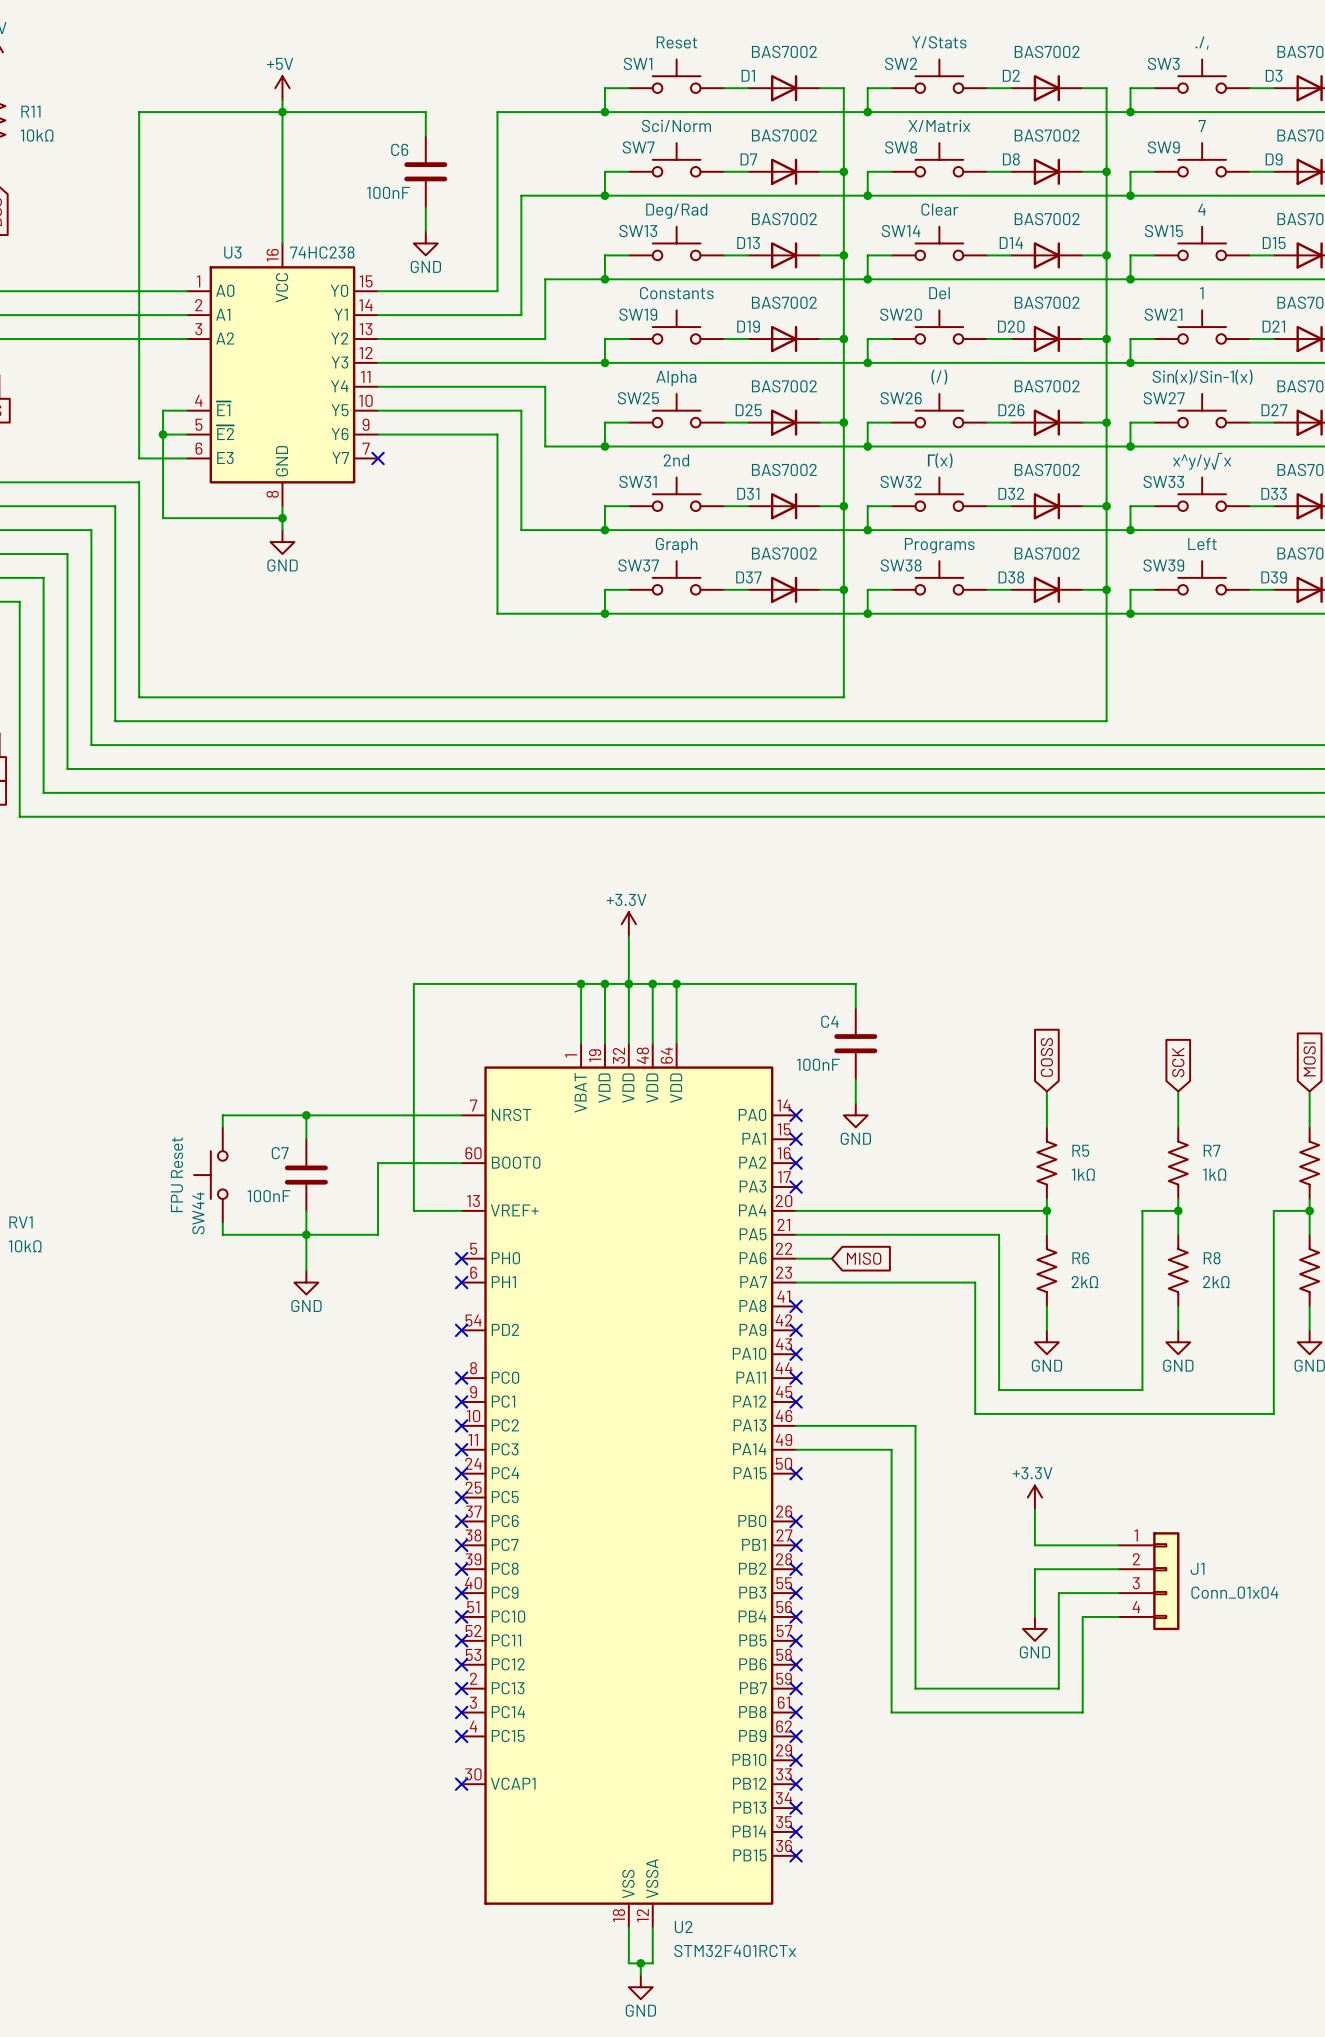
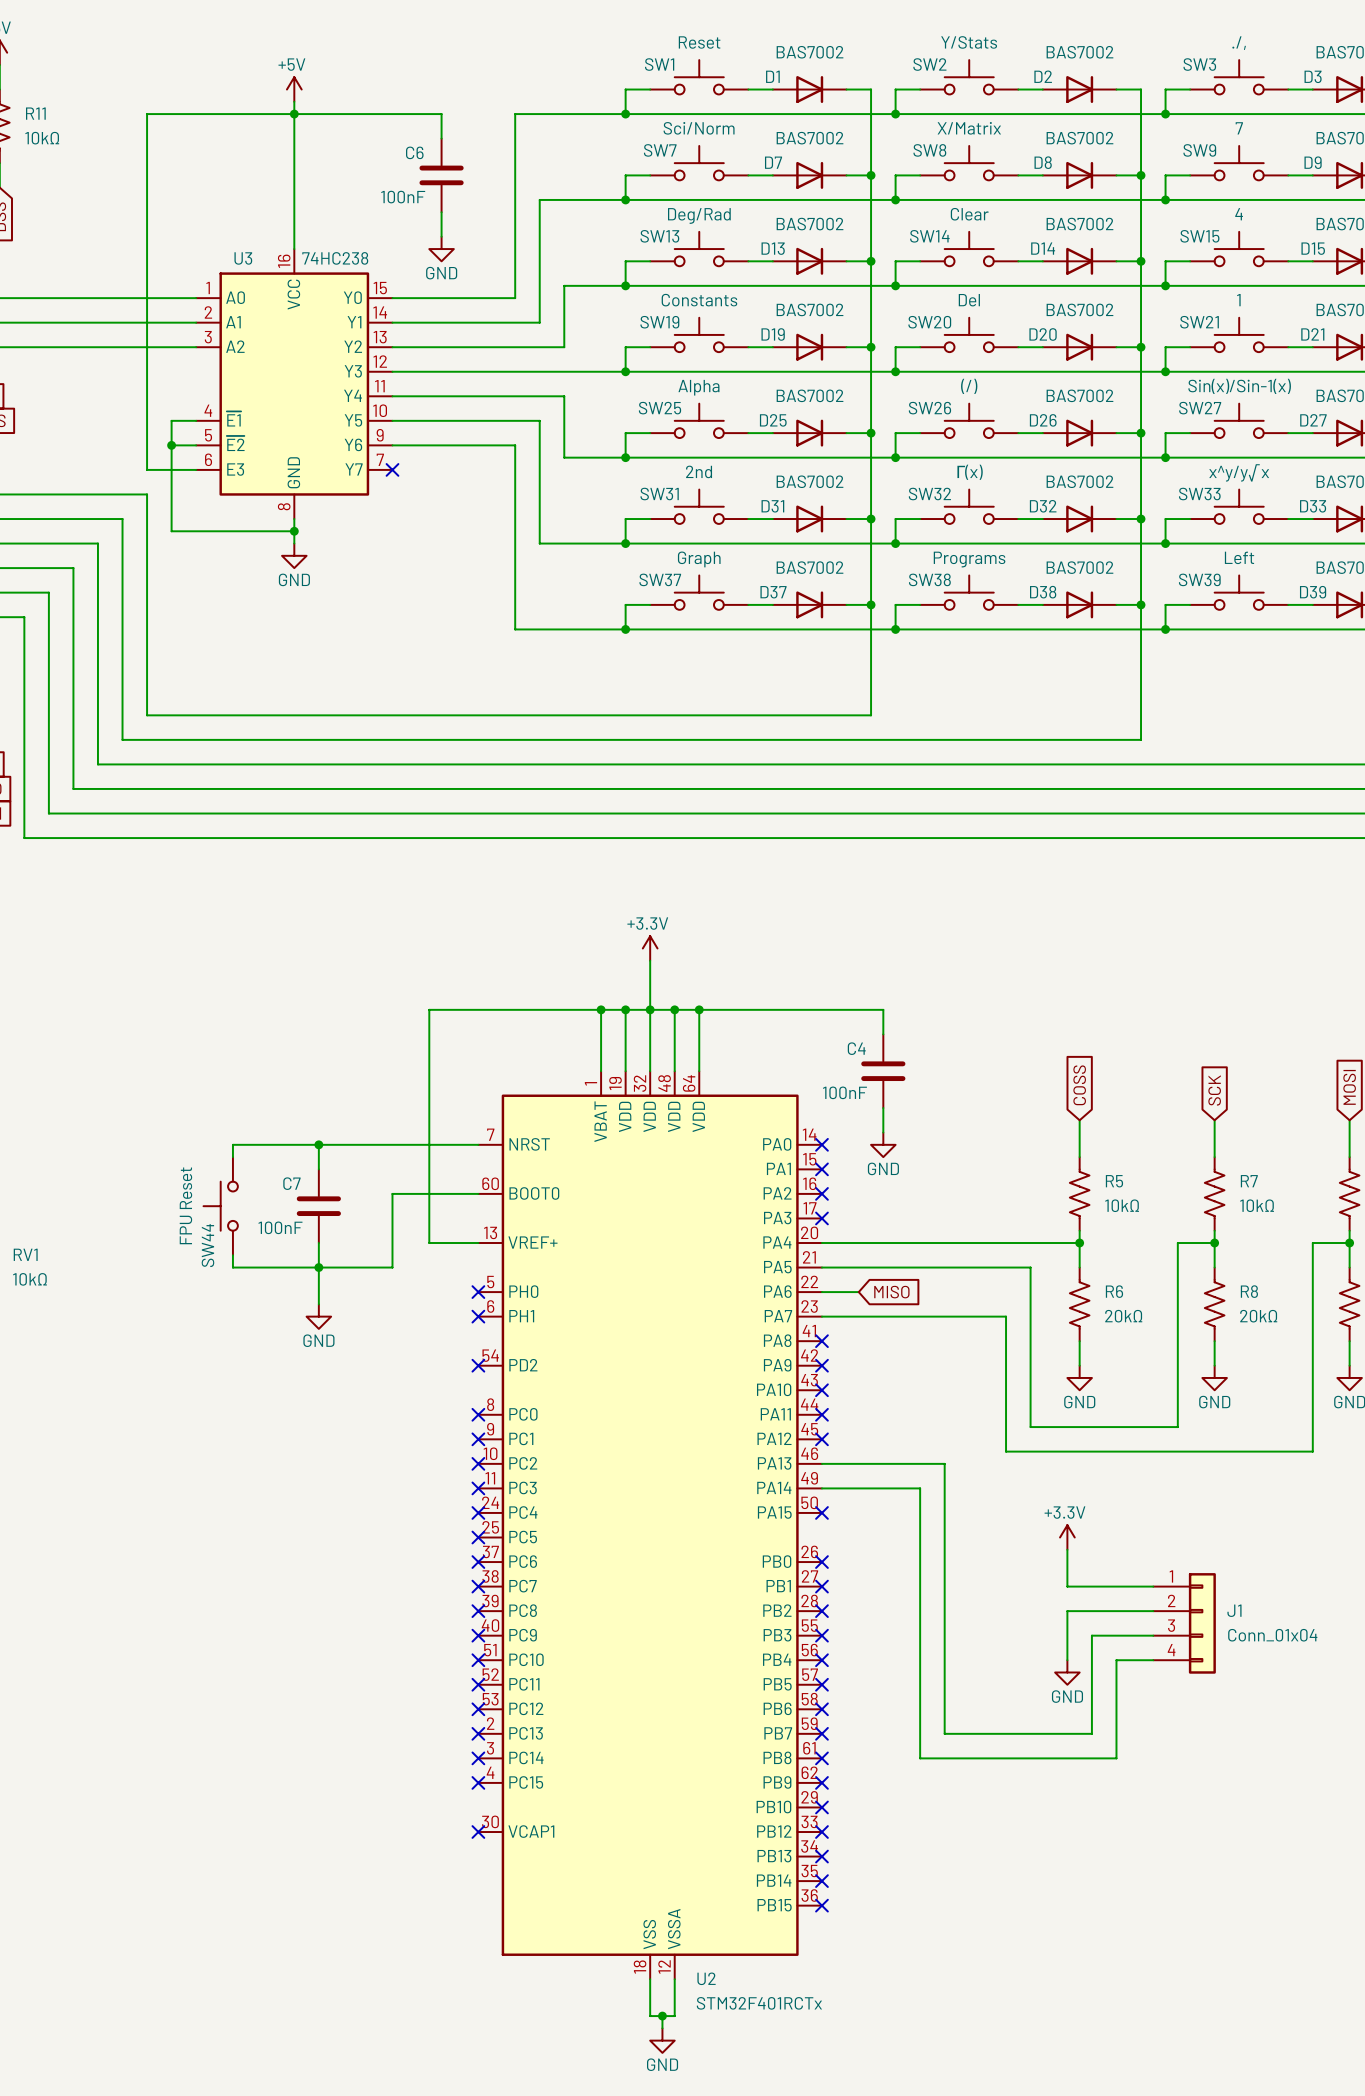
R5 value: 1kΩ (1083, 1174) -> 10kΩ (1122, 1205)
R7 value: 1kΩ (1214, 1174) -> 10kΩ (1257, 1205)
R6 value: 2kΩ (1084, 1282) -> 20kΩ (1123, 1316)
R8 value: 2kΩ (1216, 1282) -> 20kΩ (1258, 1316)

